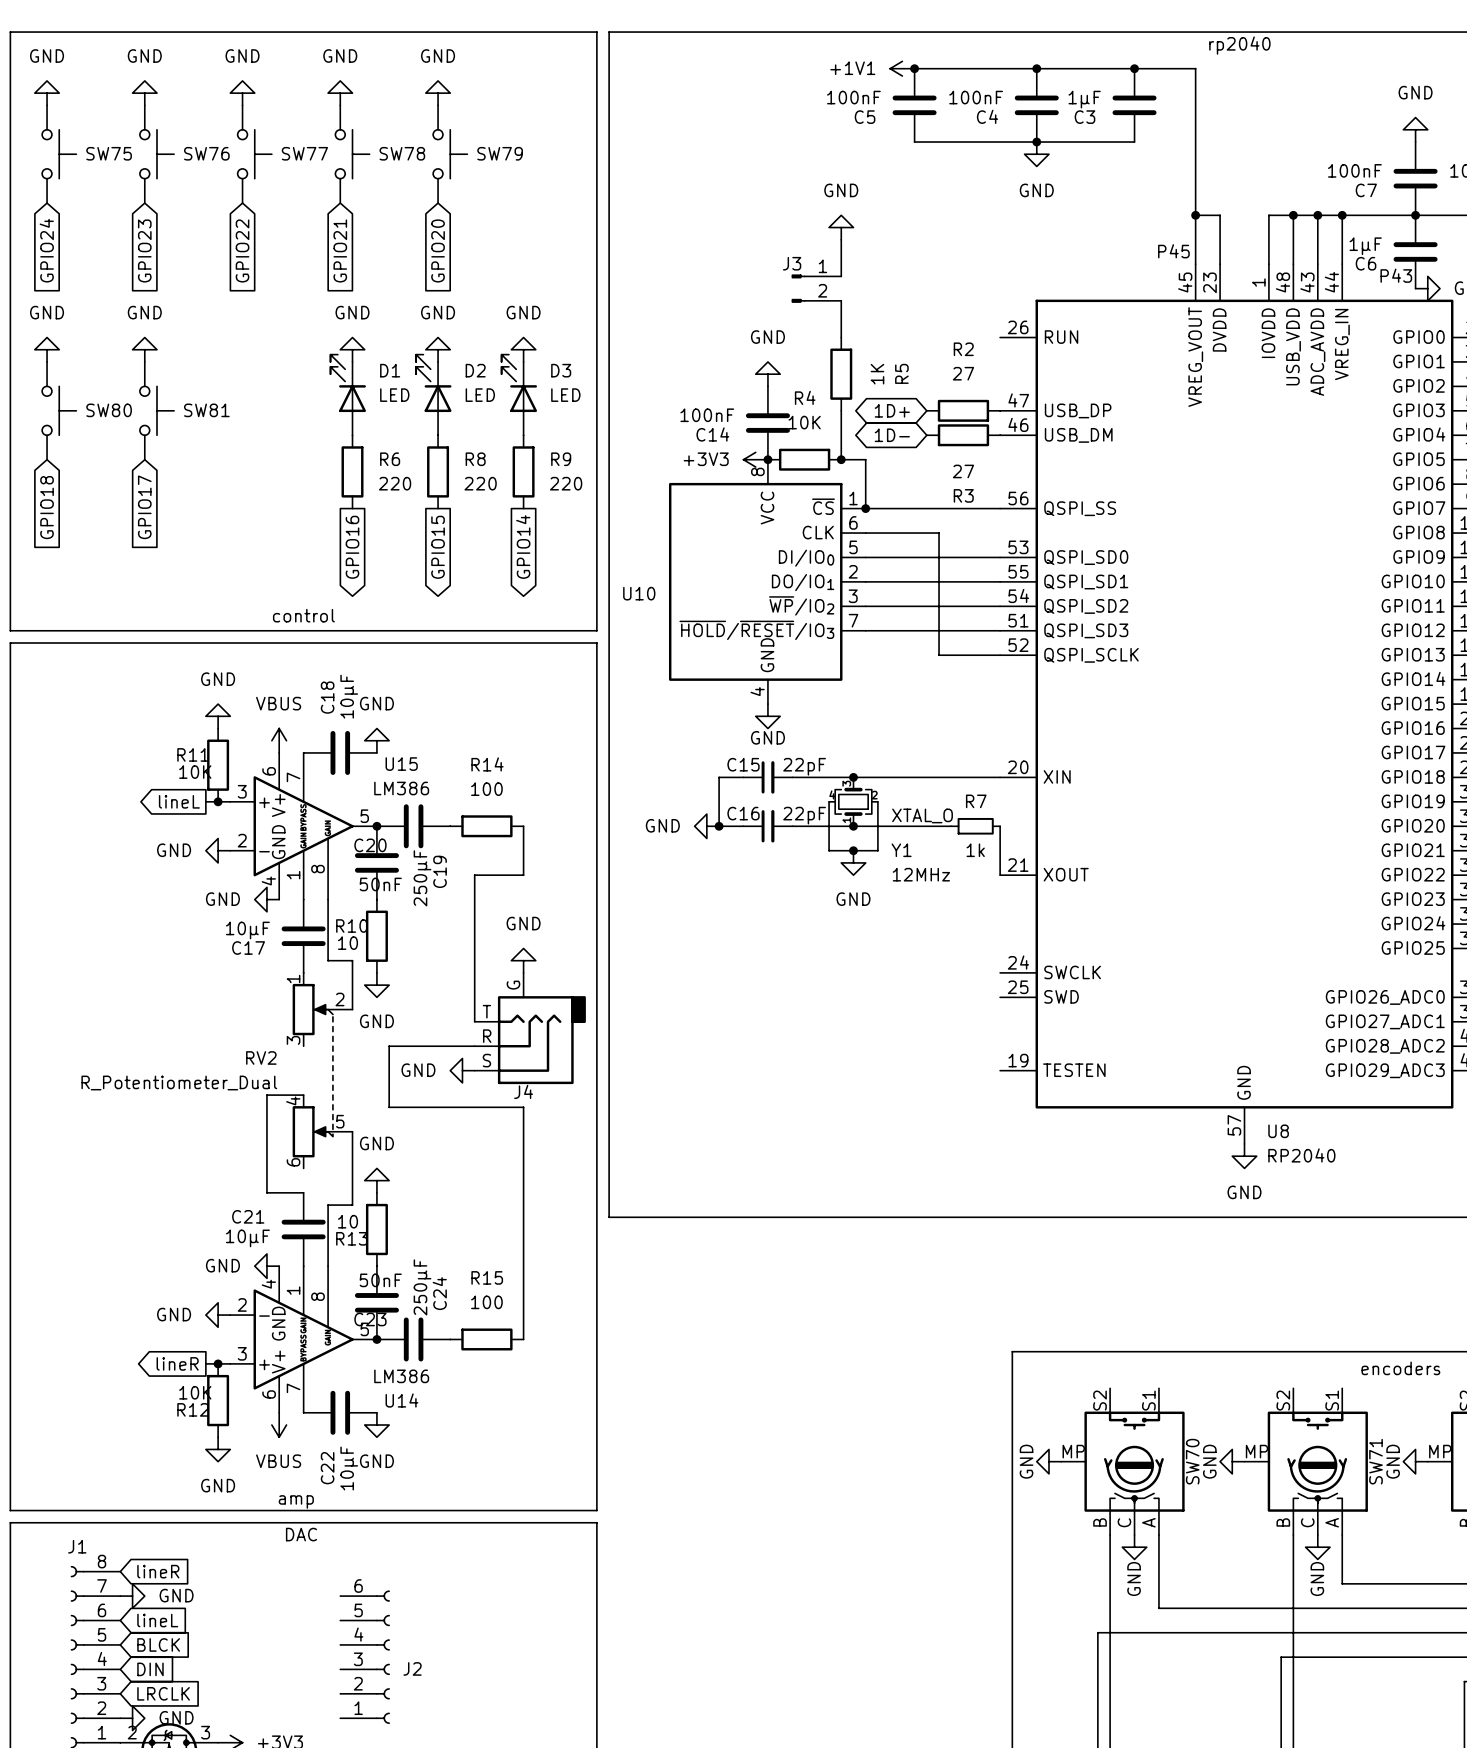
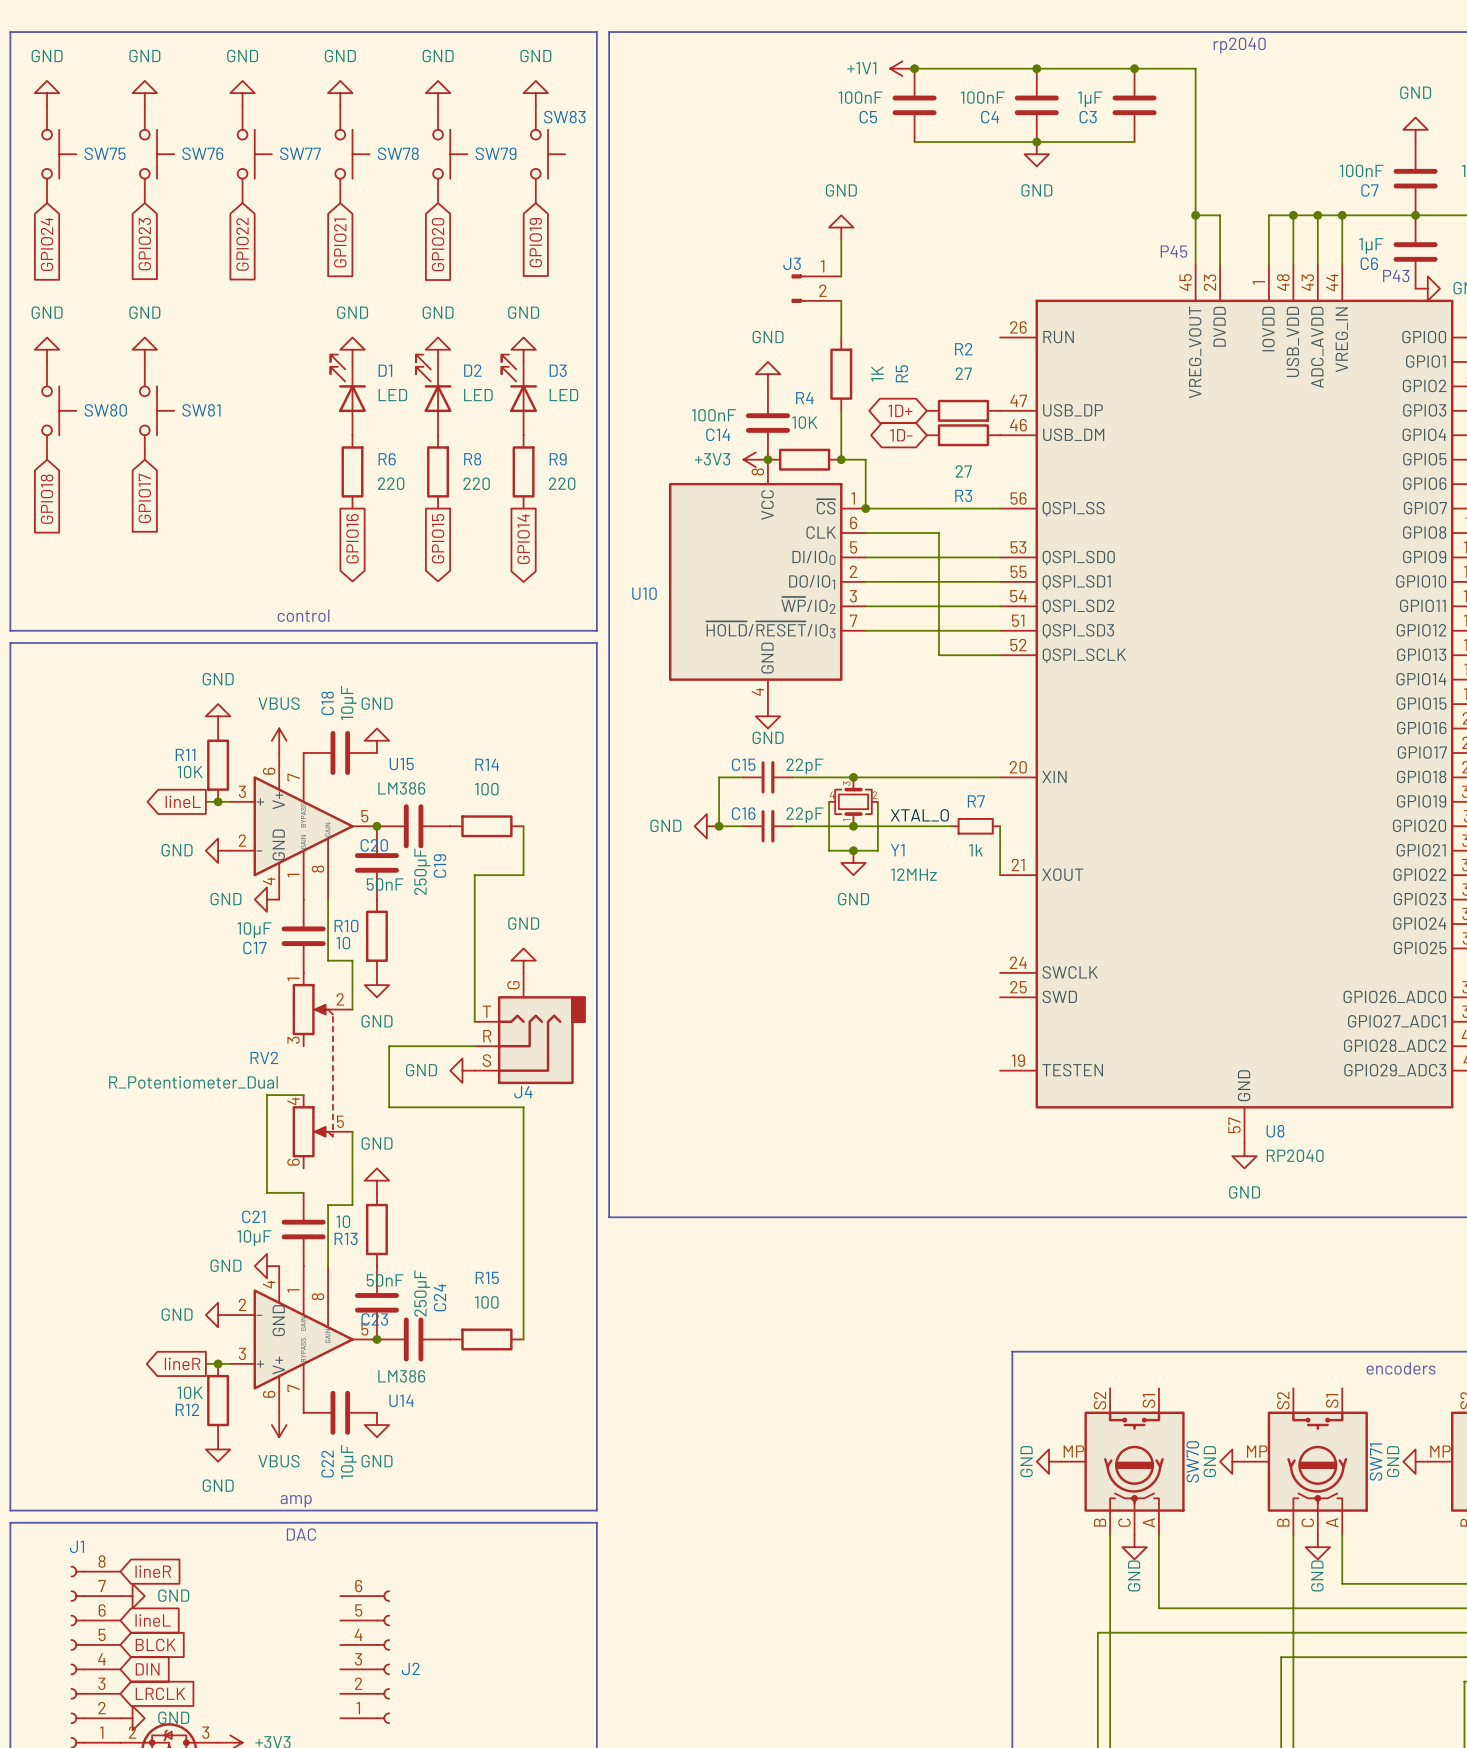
power symbol: none -> GND (535, 93)
SW83: none -> (548, 154)
global label: none -> GPIO19 (535, 242)

